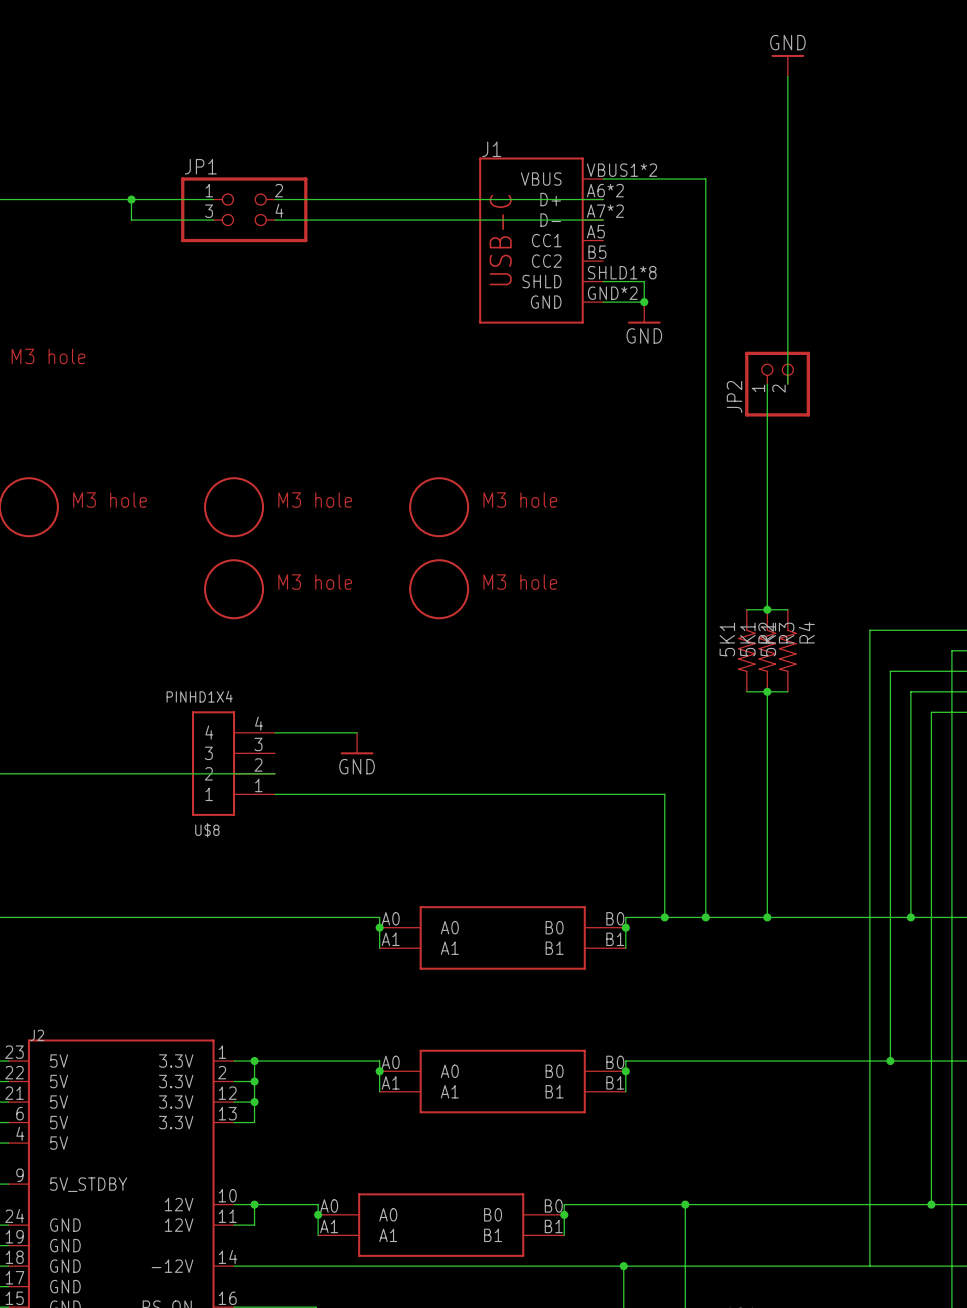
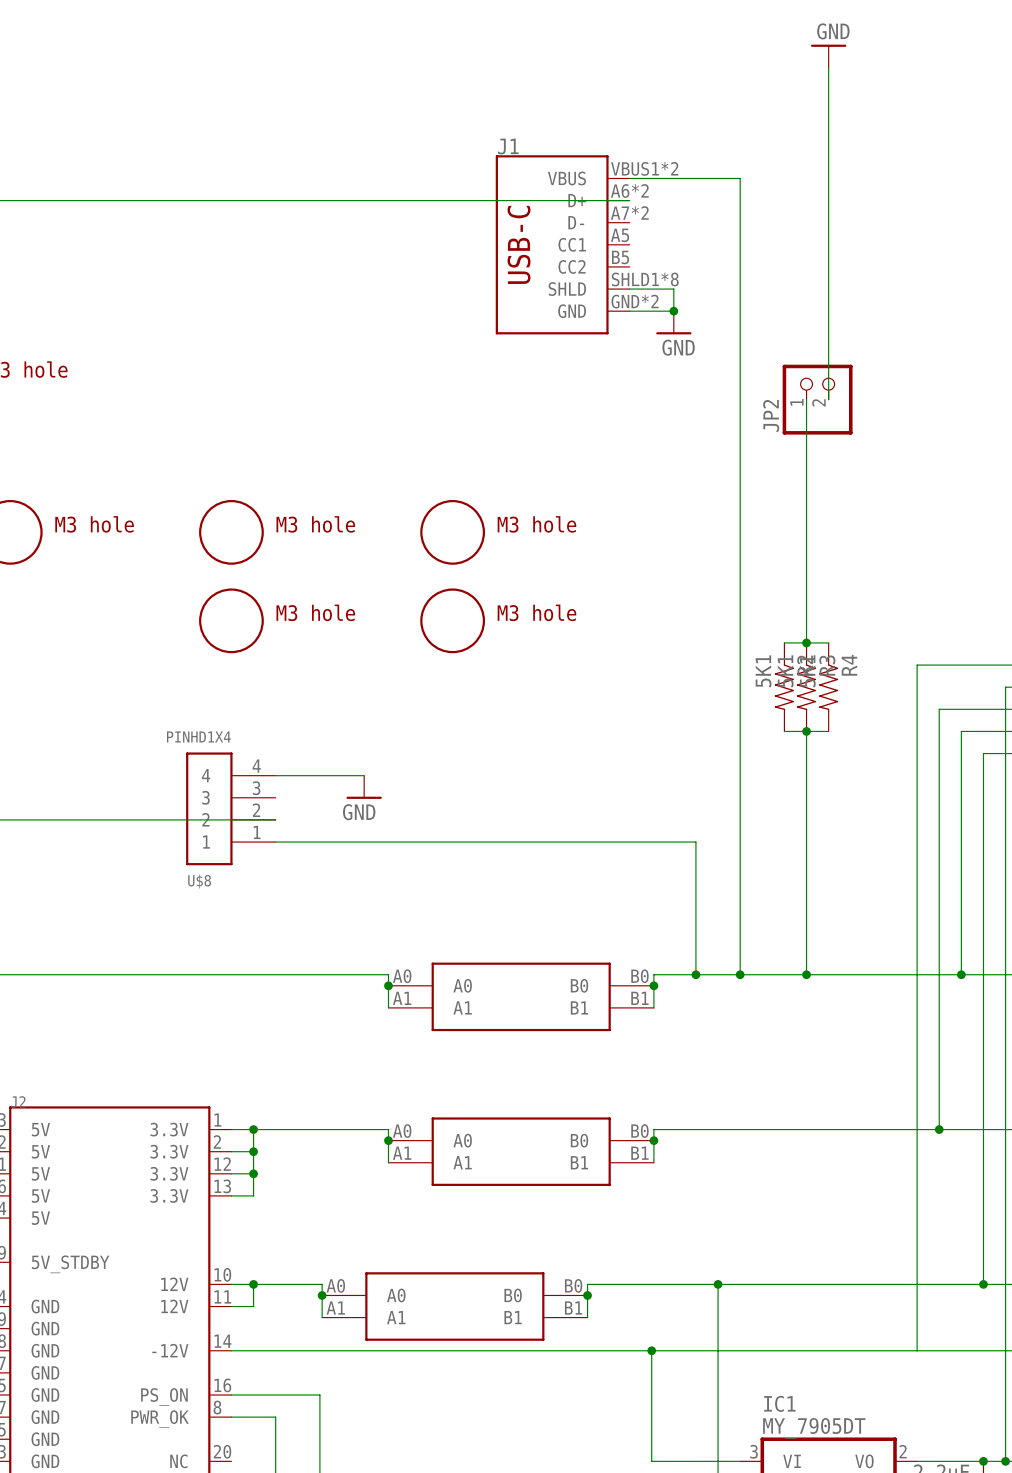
wire: (131, 199) (131, 220) (213, 220) -> none
junction: (131, 199) -> none
wire: none -> (209, 200) (275, 200)
JP1: (244, 209) -> none
wire: (275, 220) (603, 220) -> none

